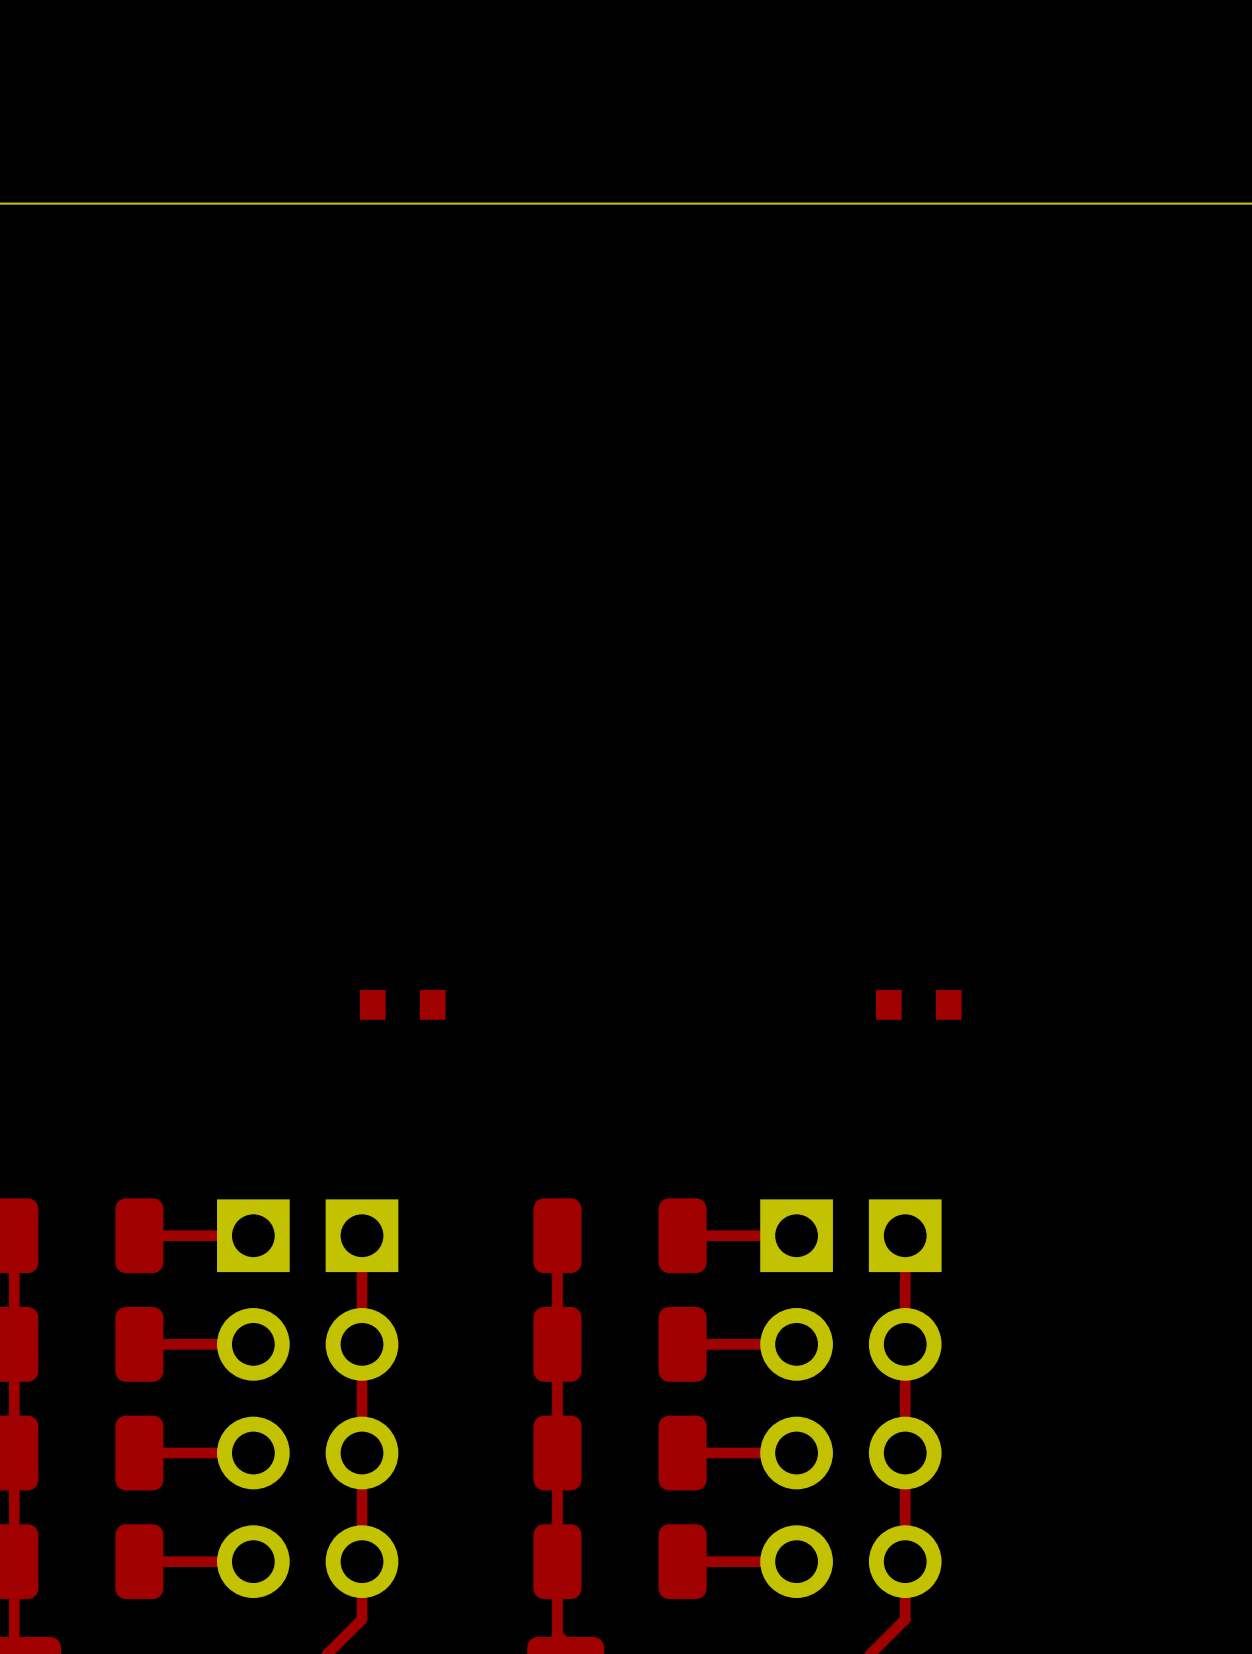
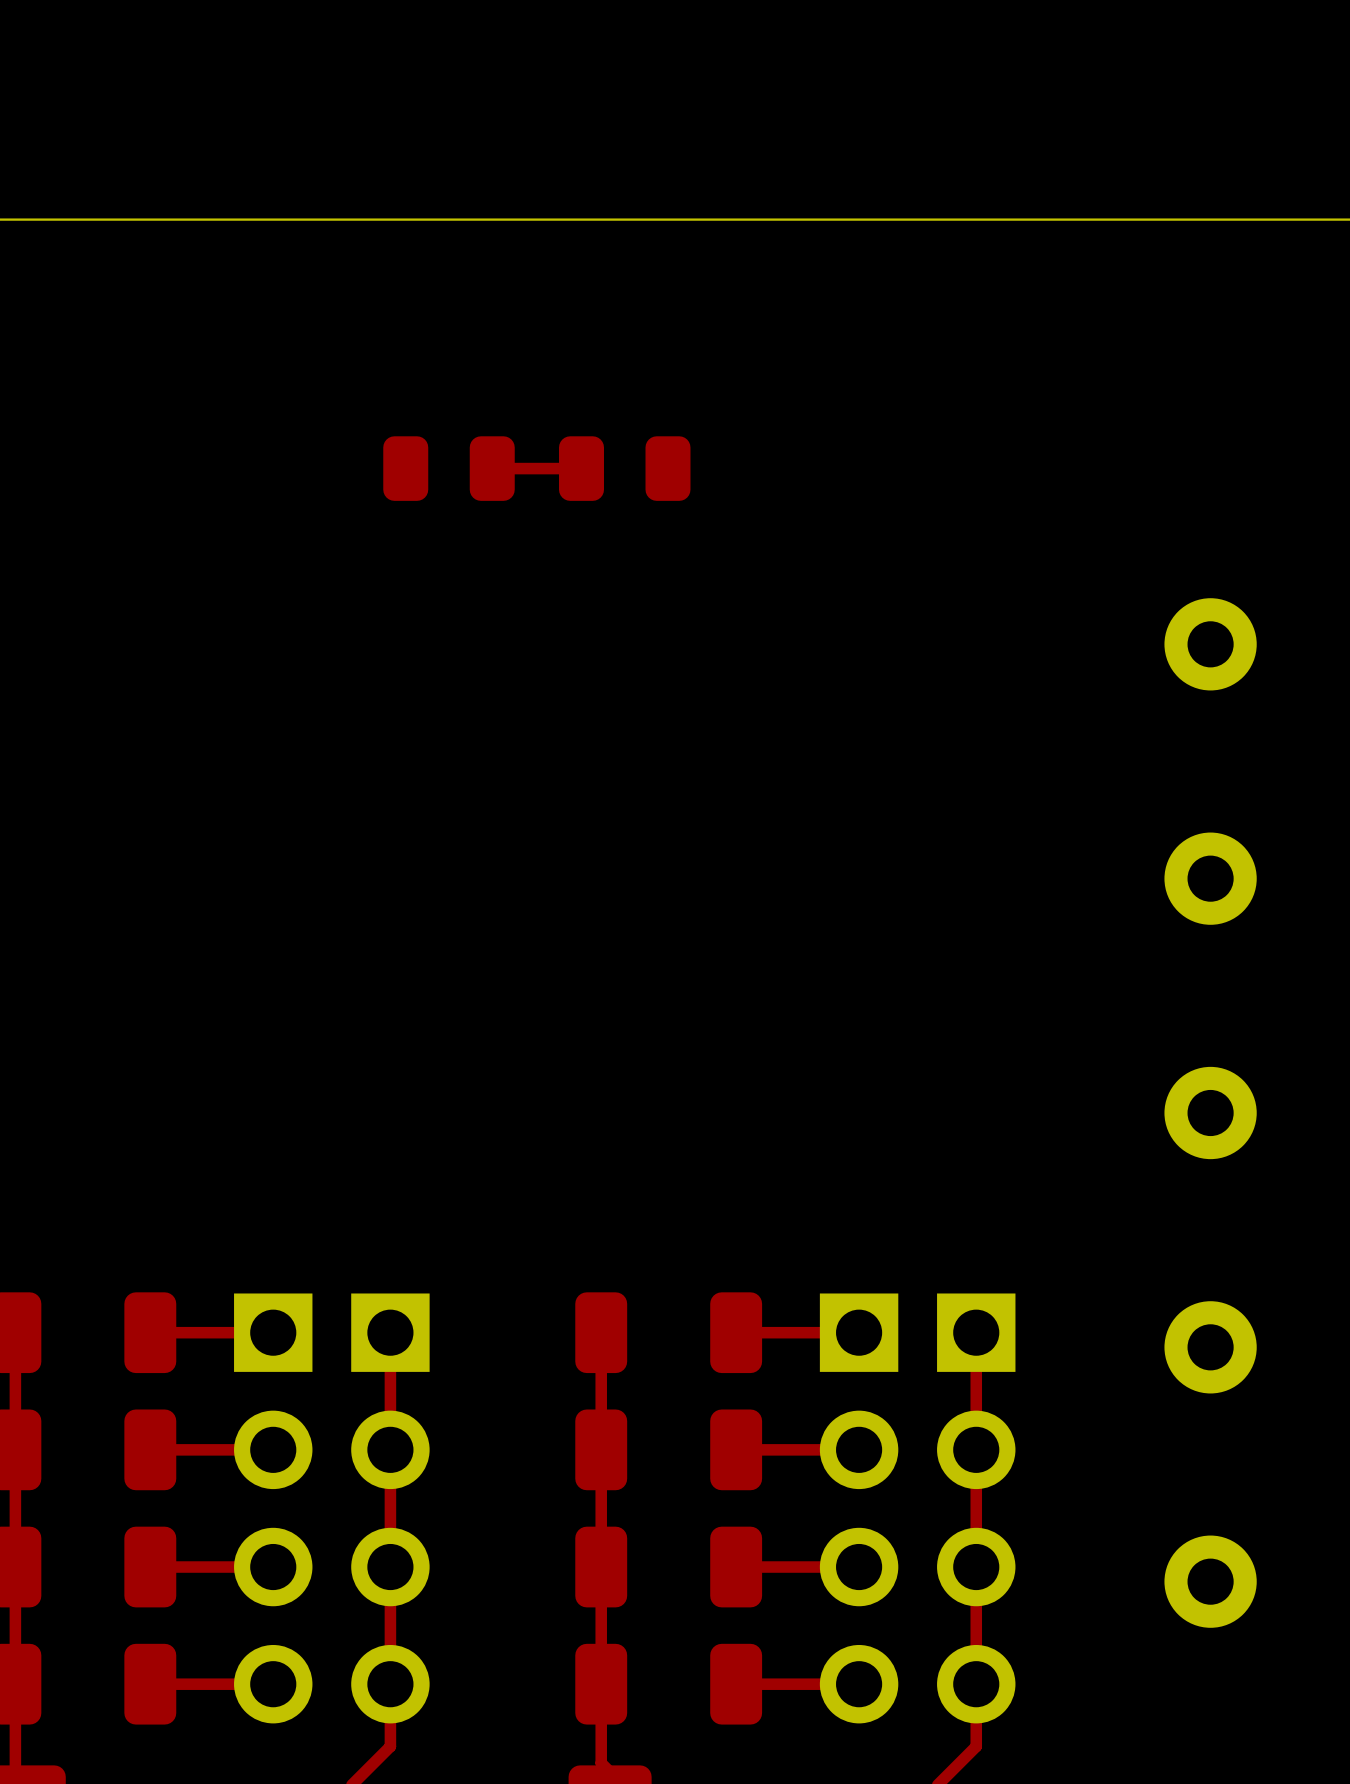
part: none -> (449, 468)
top track: none -> (581, 468) (492, 468)
part: none -> (624, 468)
part: none -> (1210, 644)
part: none -> (1210, 878)
part: (402, 1004) -> none
part: (918, 1004) -> none
part: none -> (1210, 1113)
part: none -> (1210, 1347)
part: none -> (1210, 1581)

